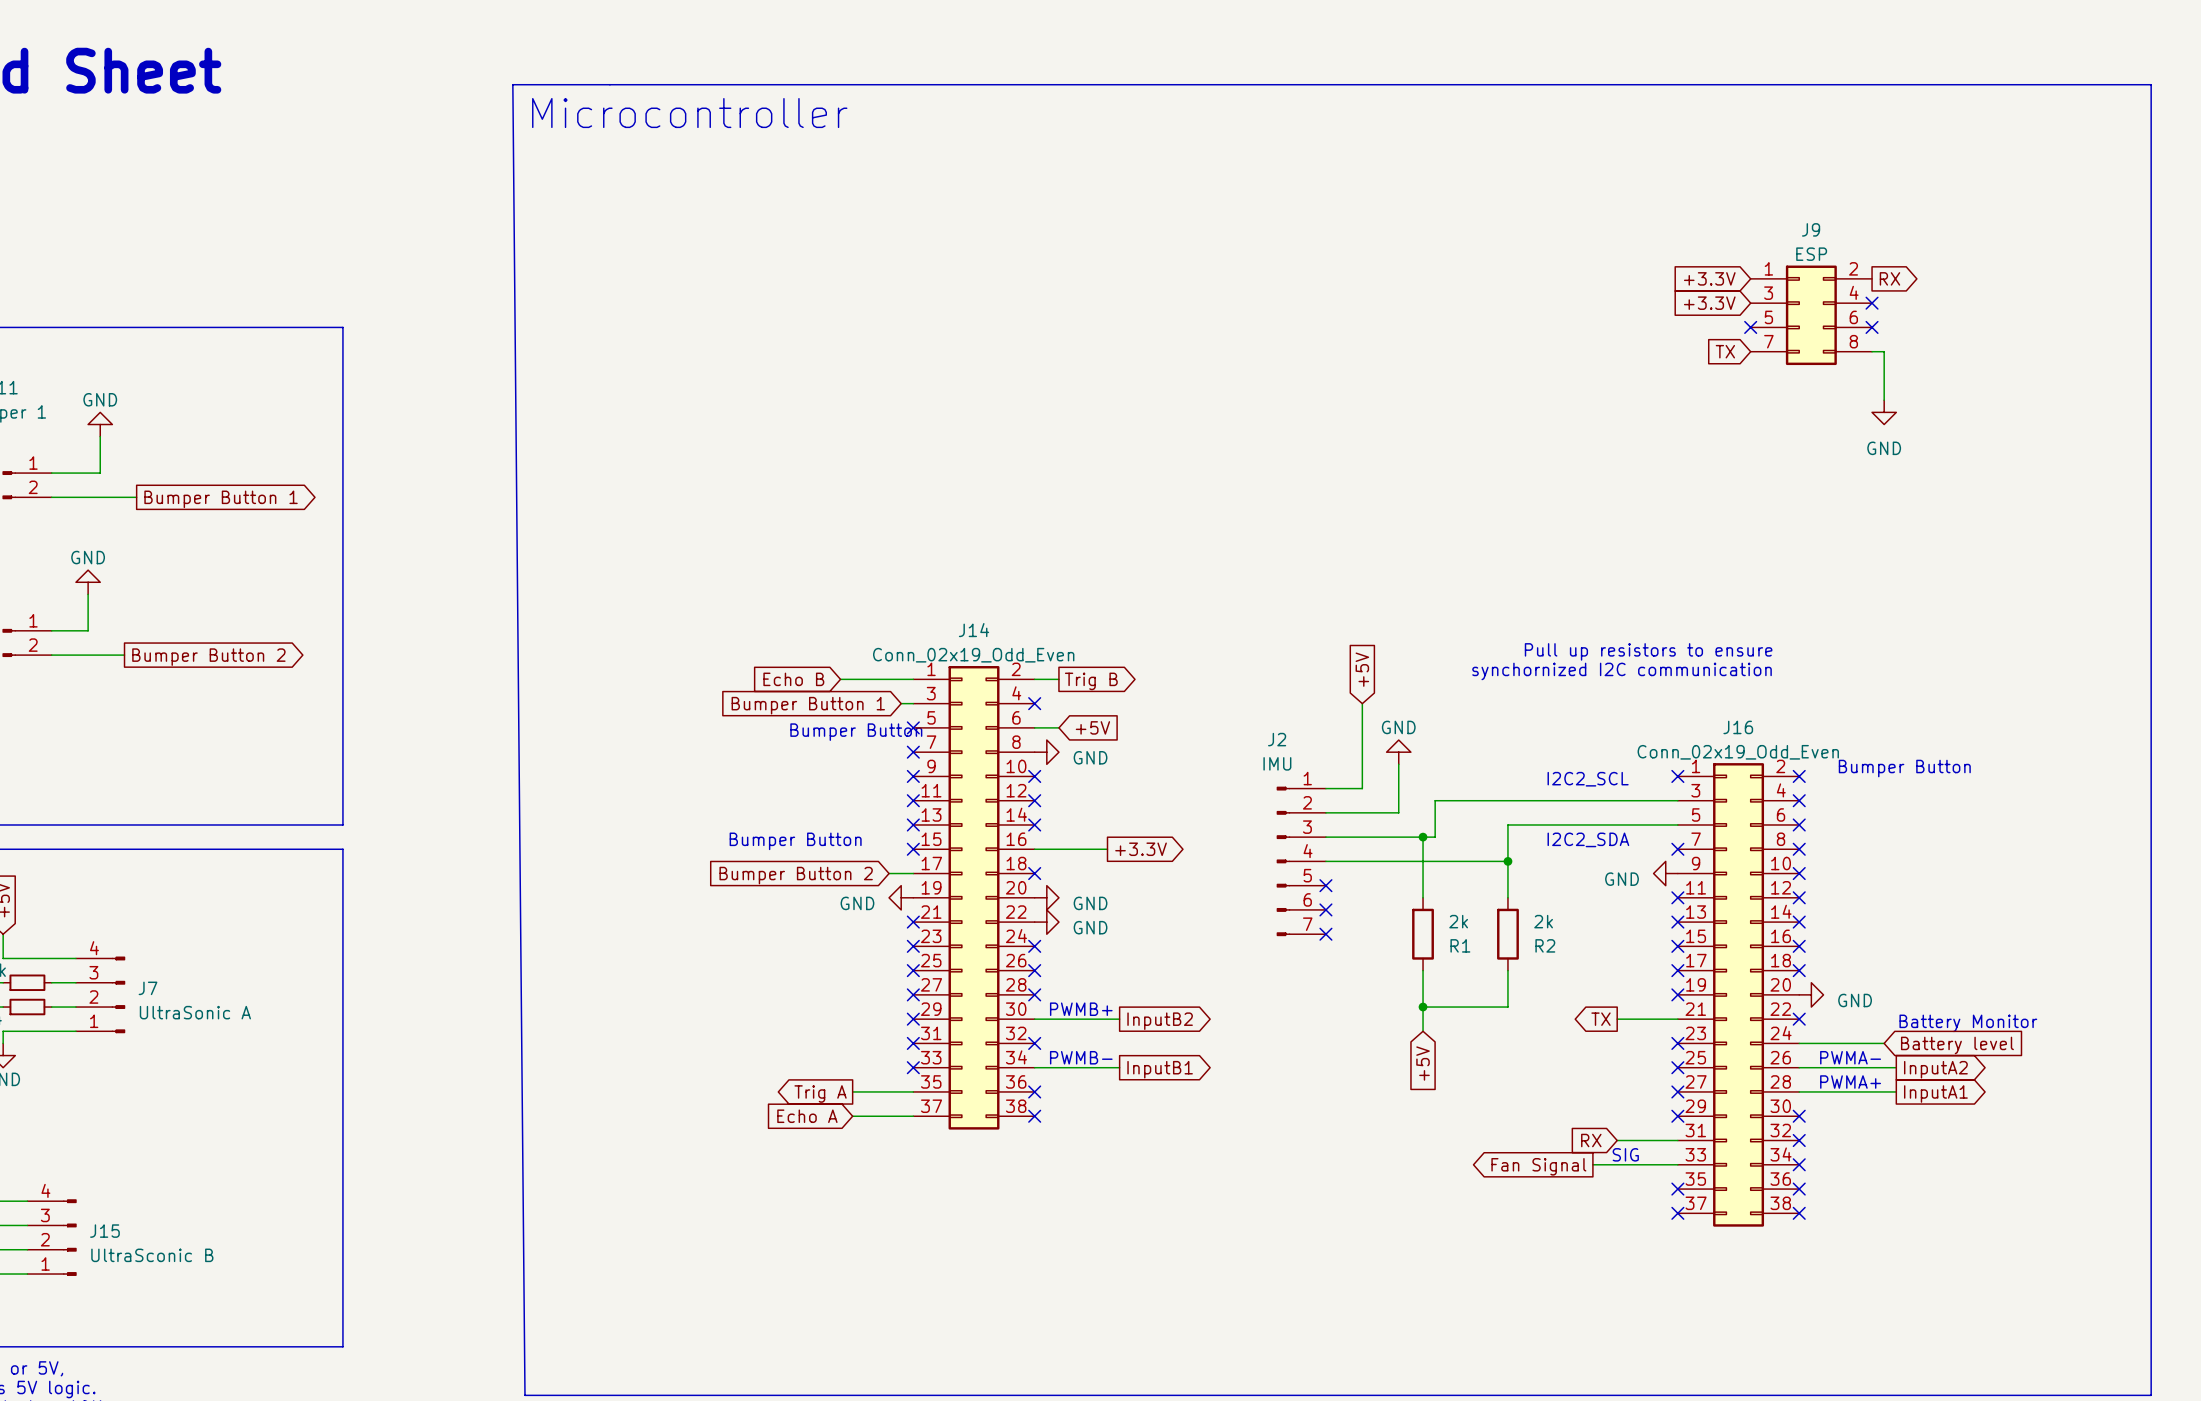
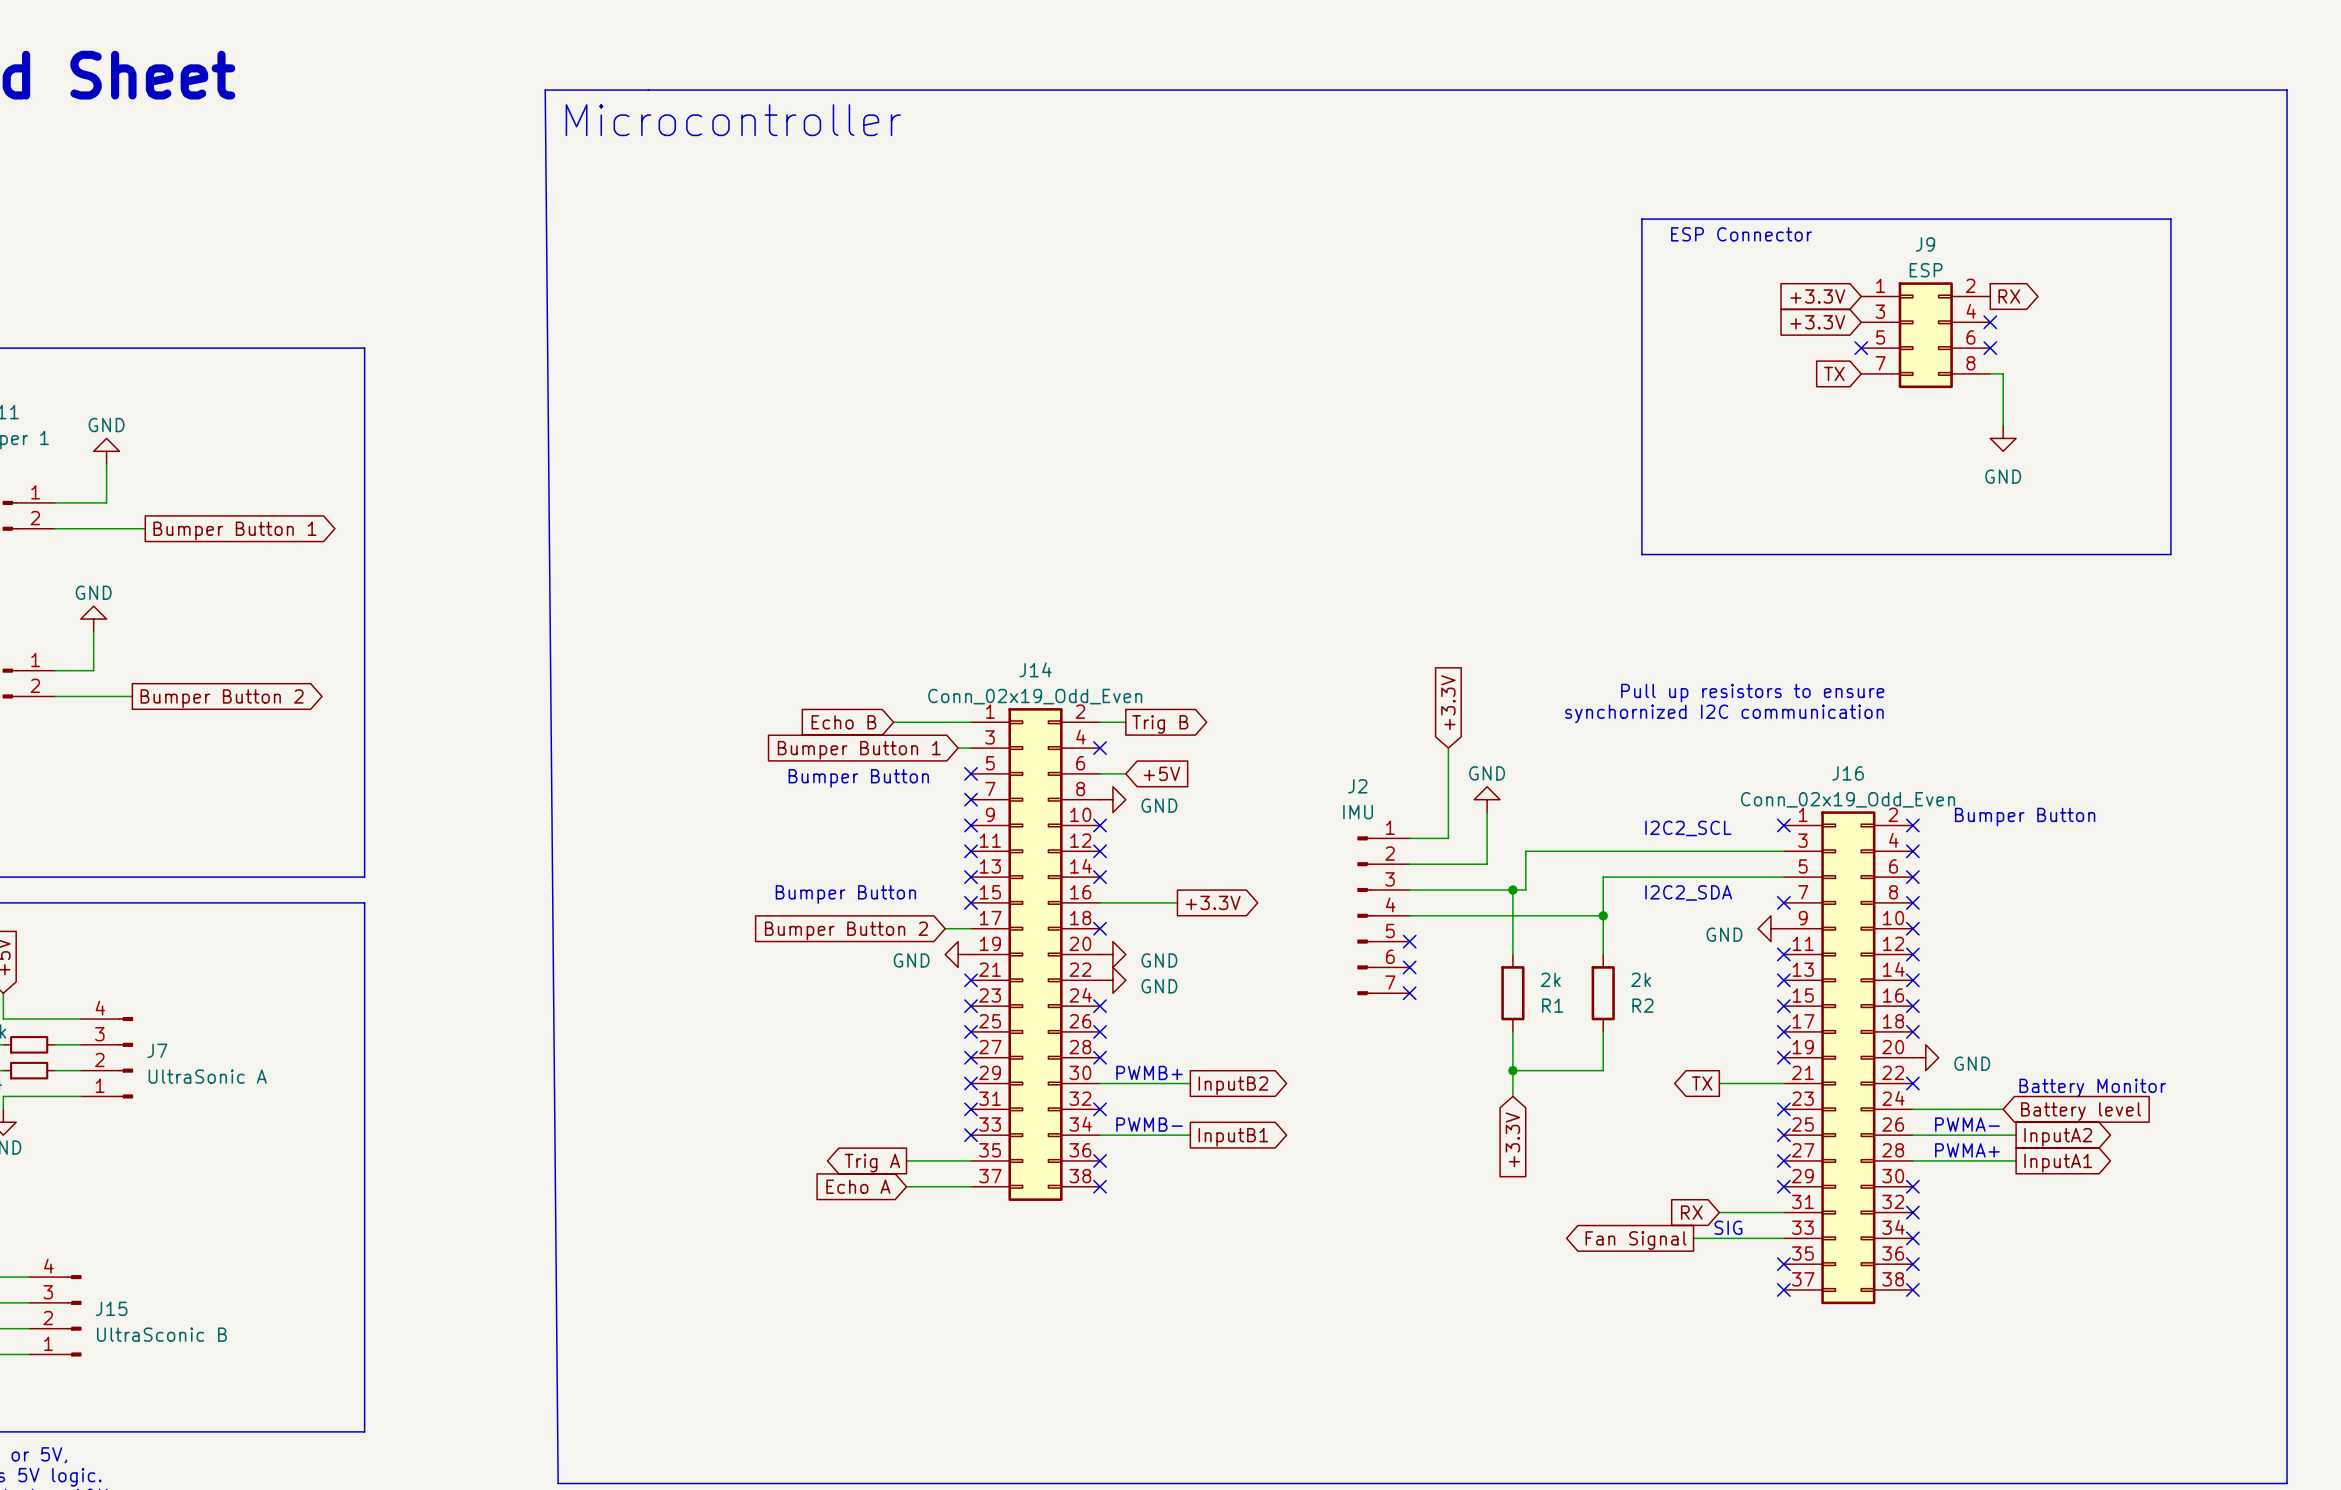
line: none -> (1641, 219) (2170, 219) (2170, 554) (1641, 554) (1641, 219)
text: none -> ESP Connector (1741, 234)
global label: +5V (1362, 669) -> +3.3V (1448, 702)
text position: Bumper Button (856, 732) -> Bumper Button (858, 778)
global label: +5V (1423, 1063) -> +3.3V (1512, 1139)

